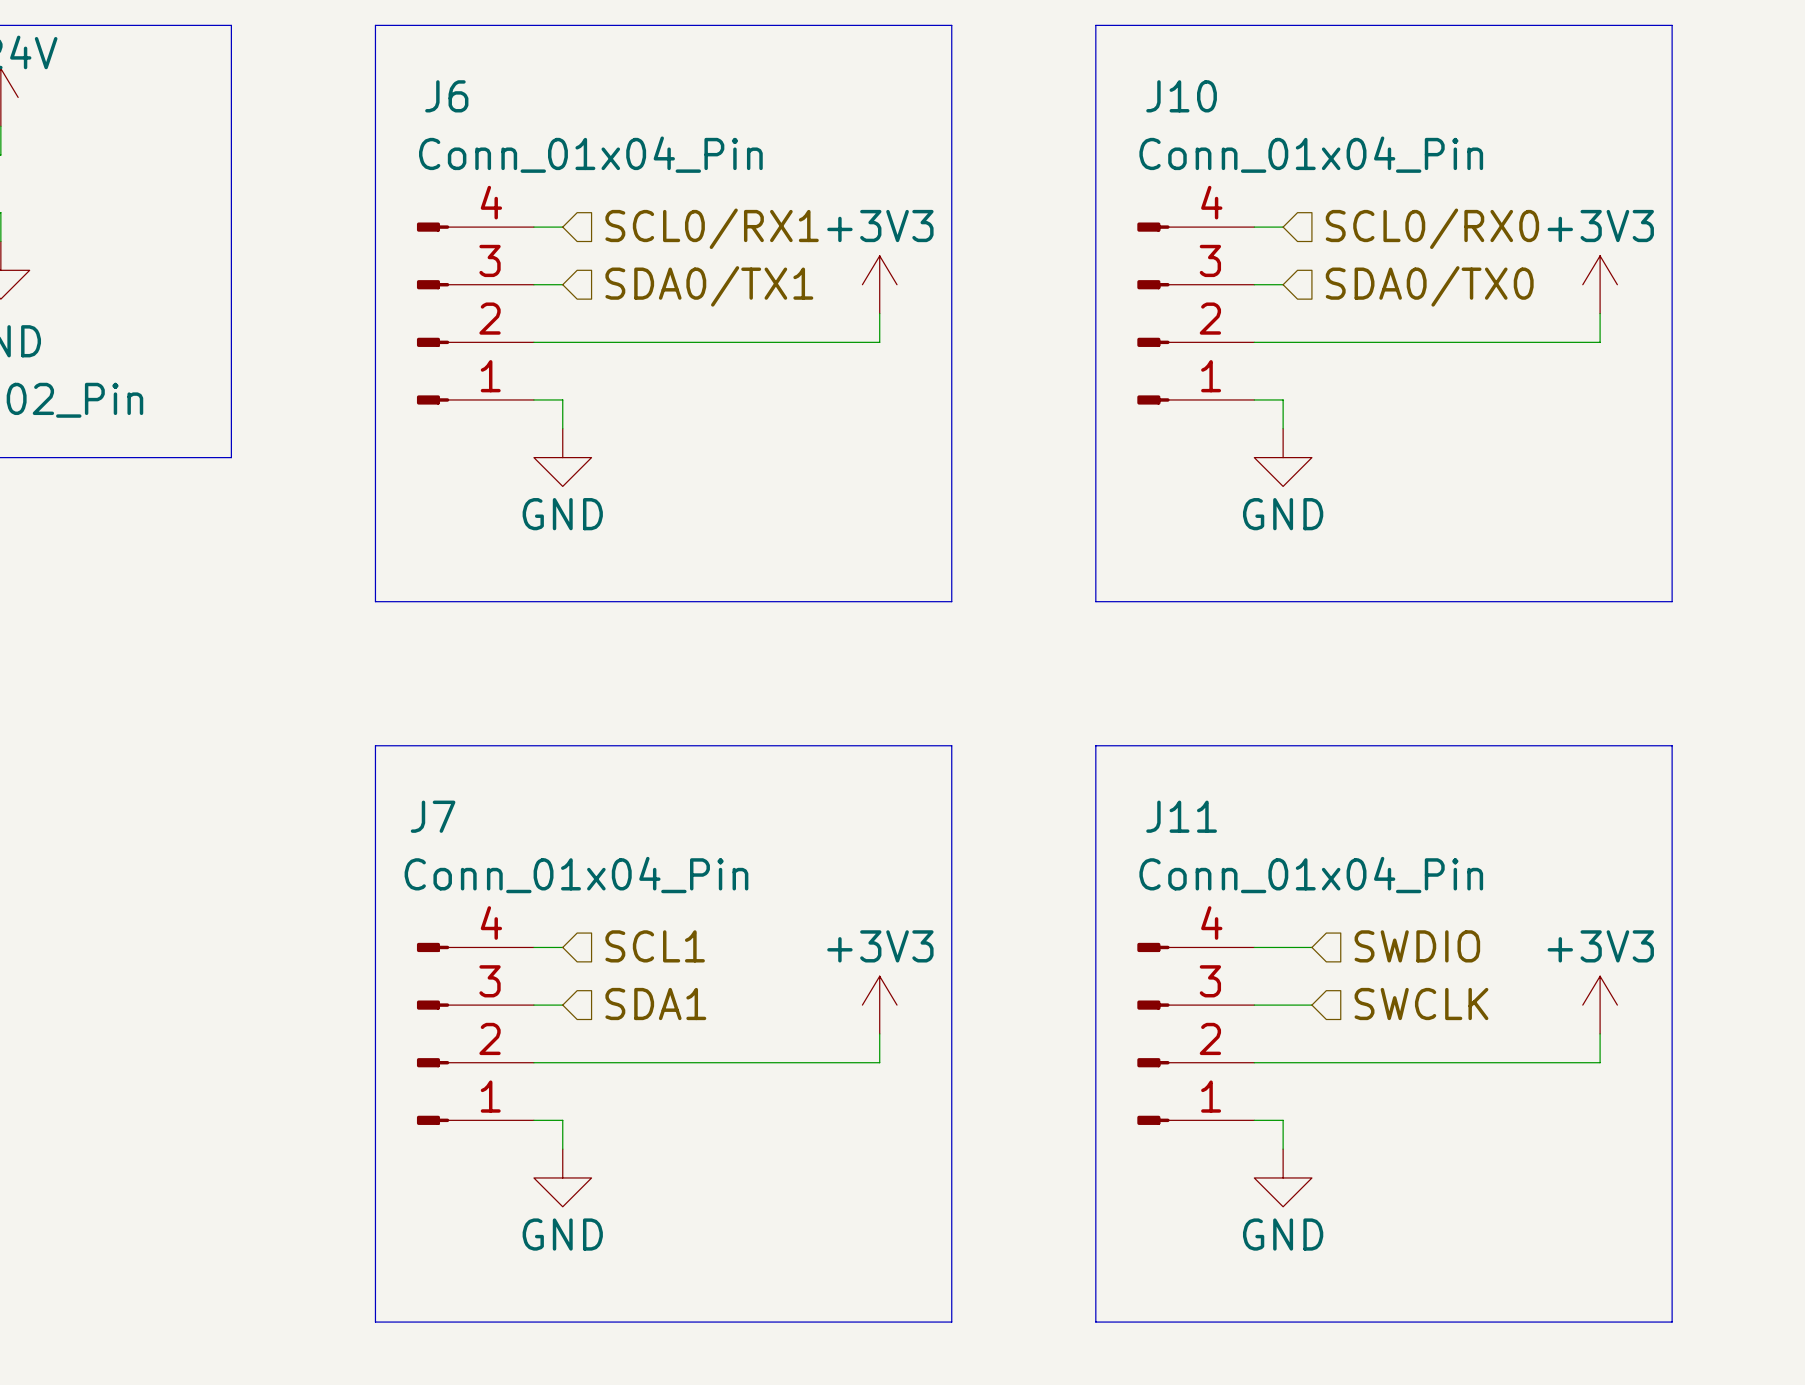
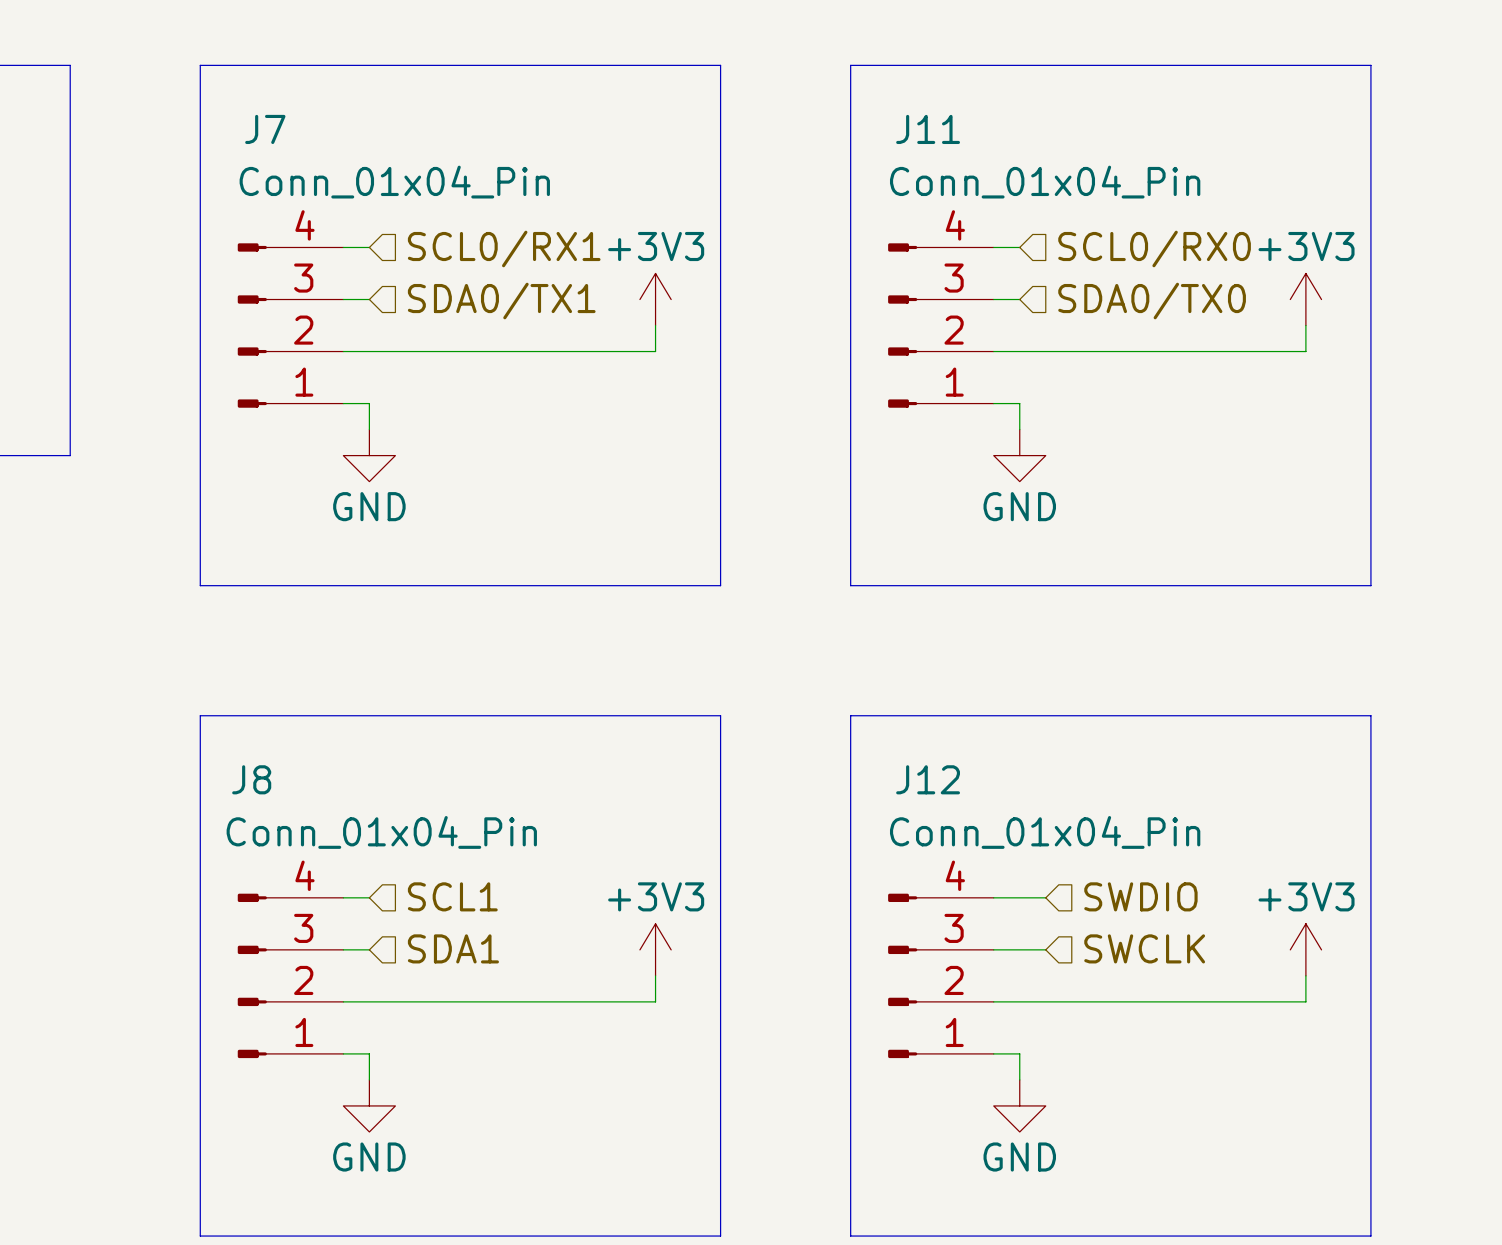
J6 name: J6 (446, 96) -> J7 (265, 129)
J10 name: J10 (1181, 96) -> J11 (928, 129)
J7 name: J7 (433, 816) -> J8 (251, 779)
J11 name: J11 (1181, 816) -> J12 (928, 779)

